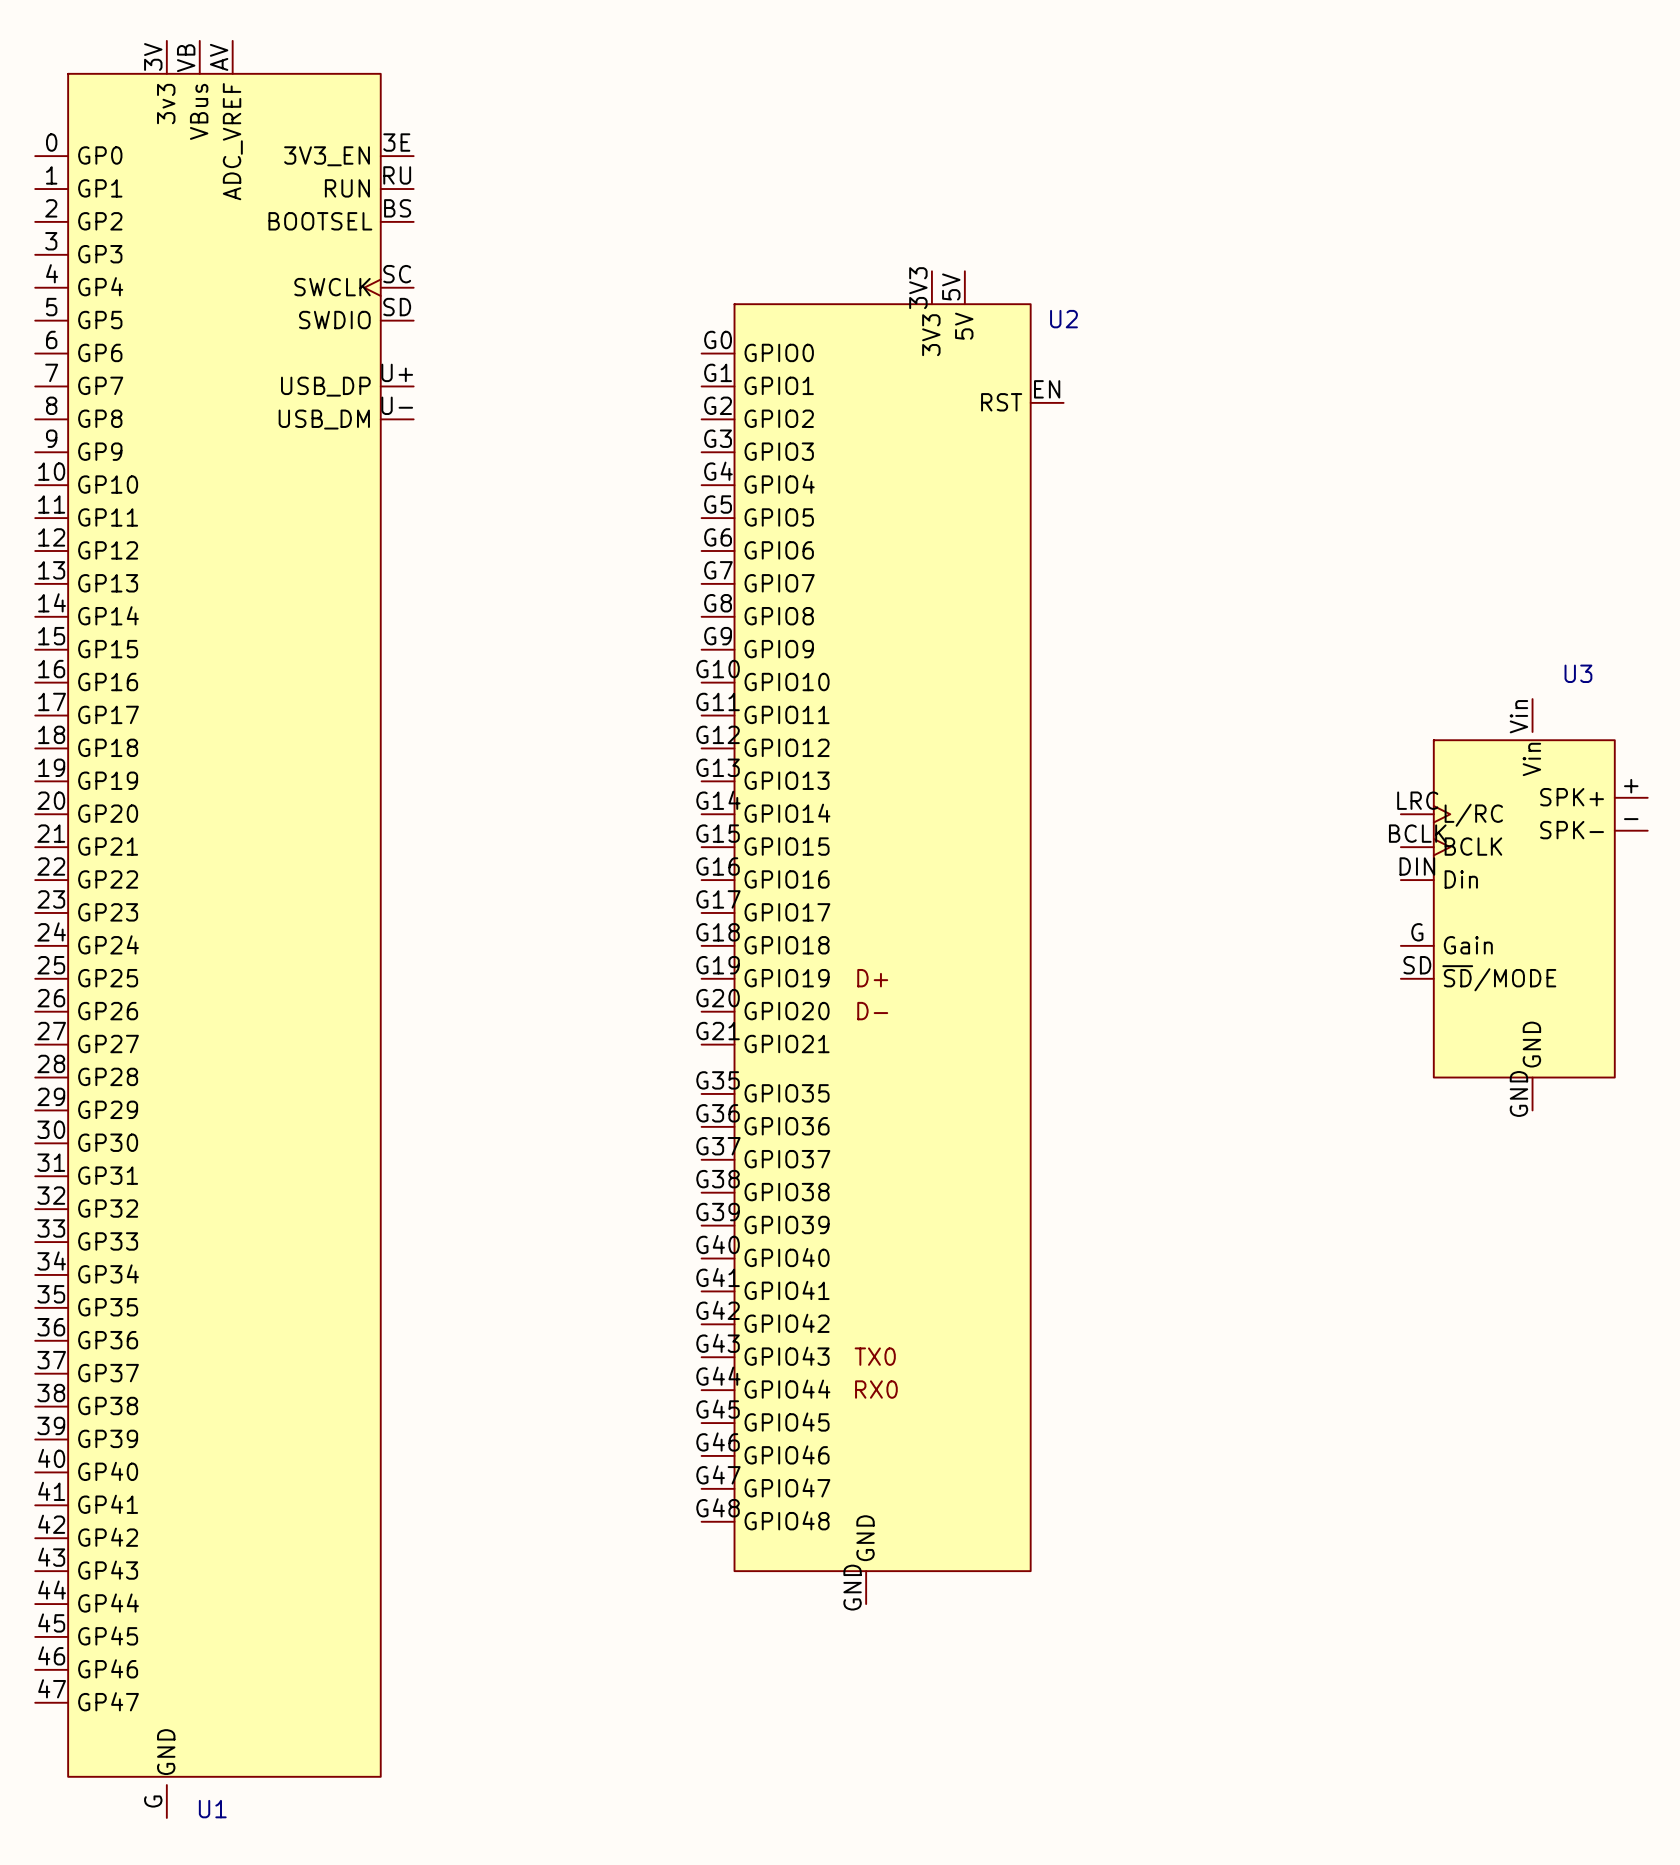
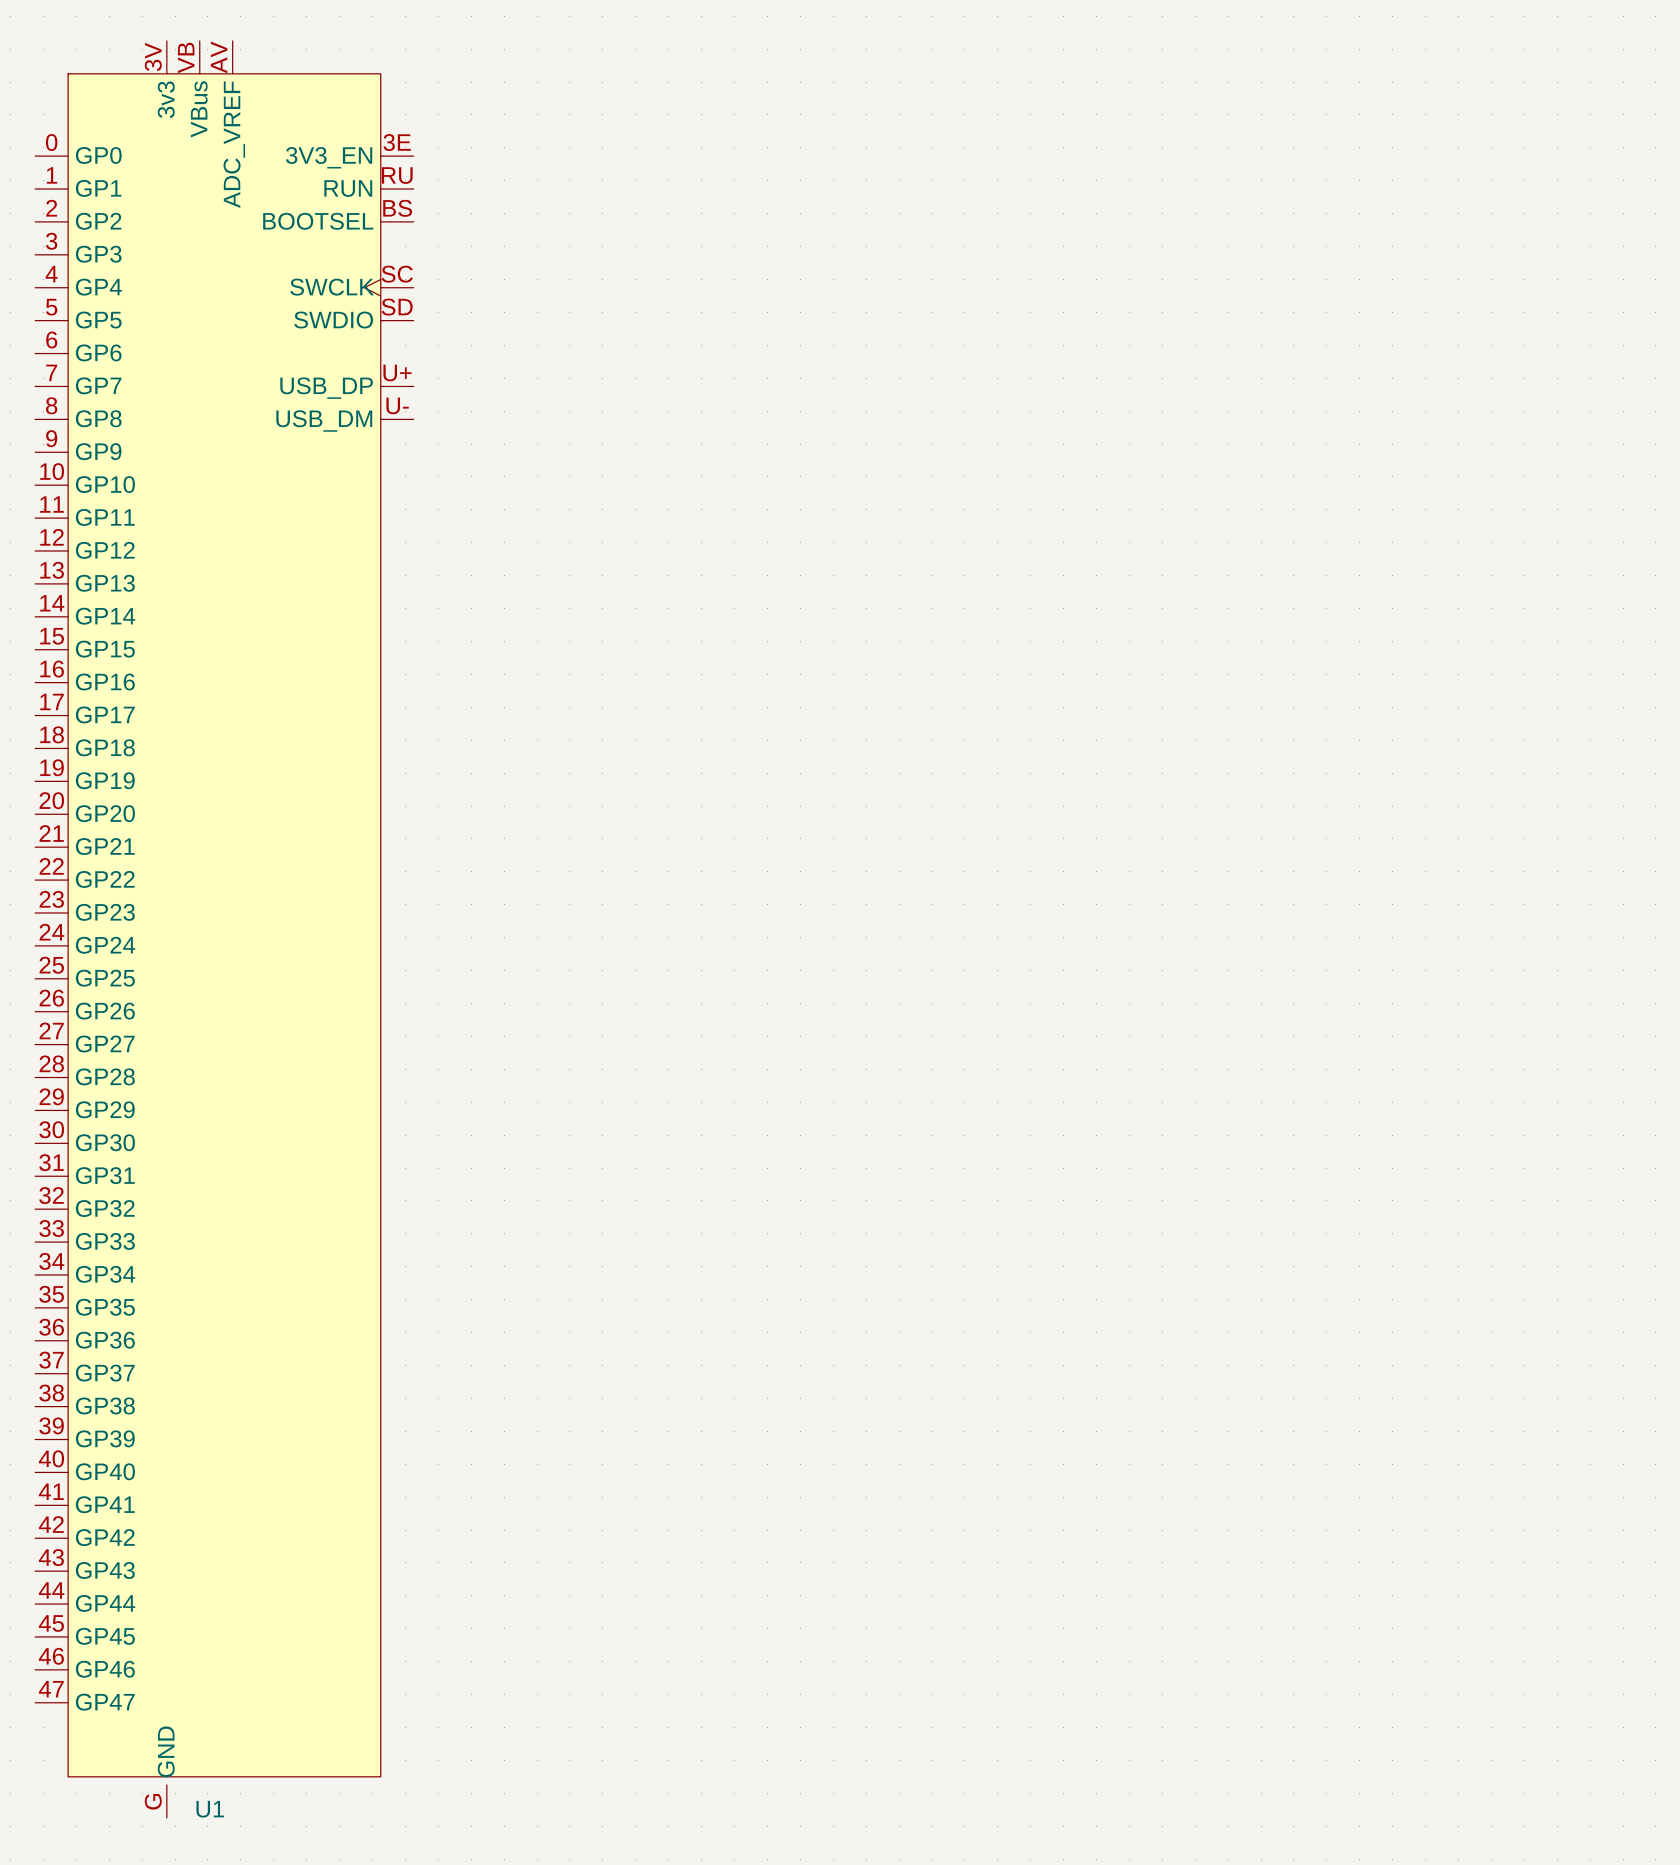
U3: (1524, 904) -> none
U2: (882, 937) -> none

